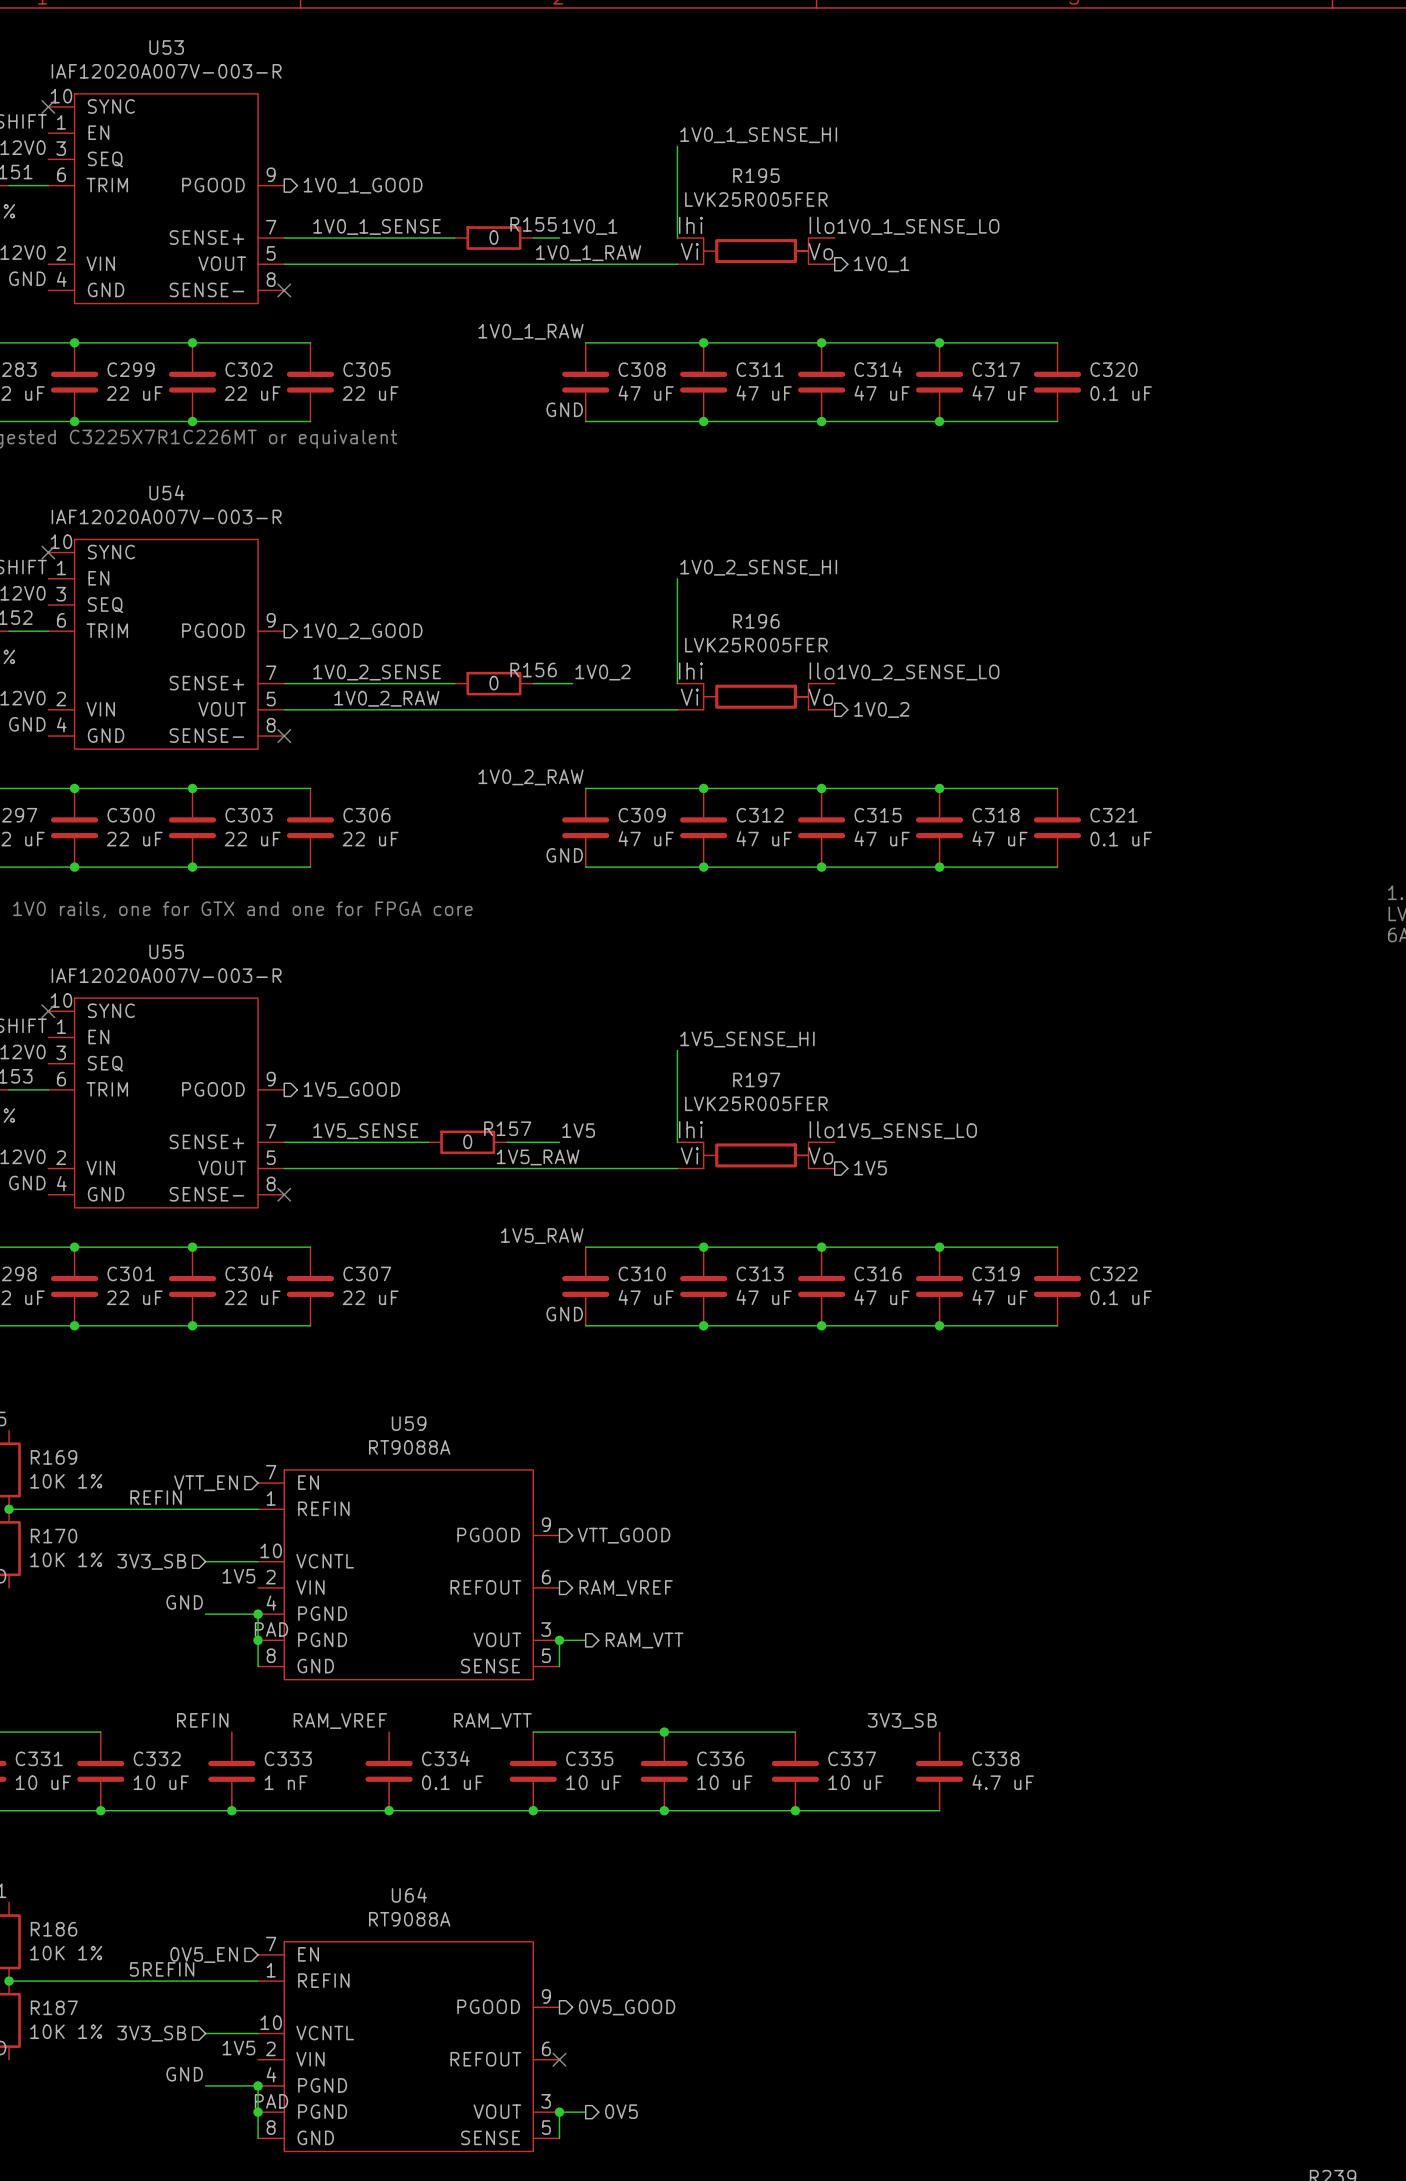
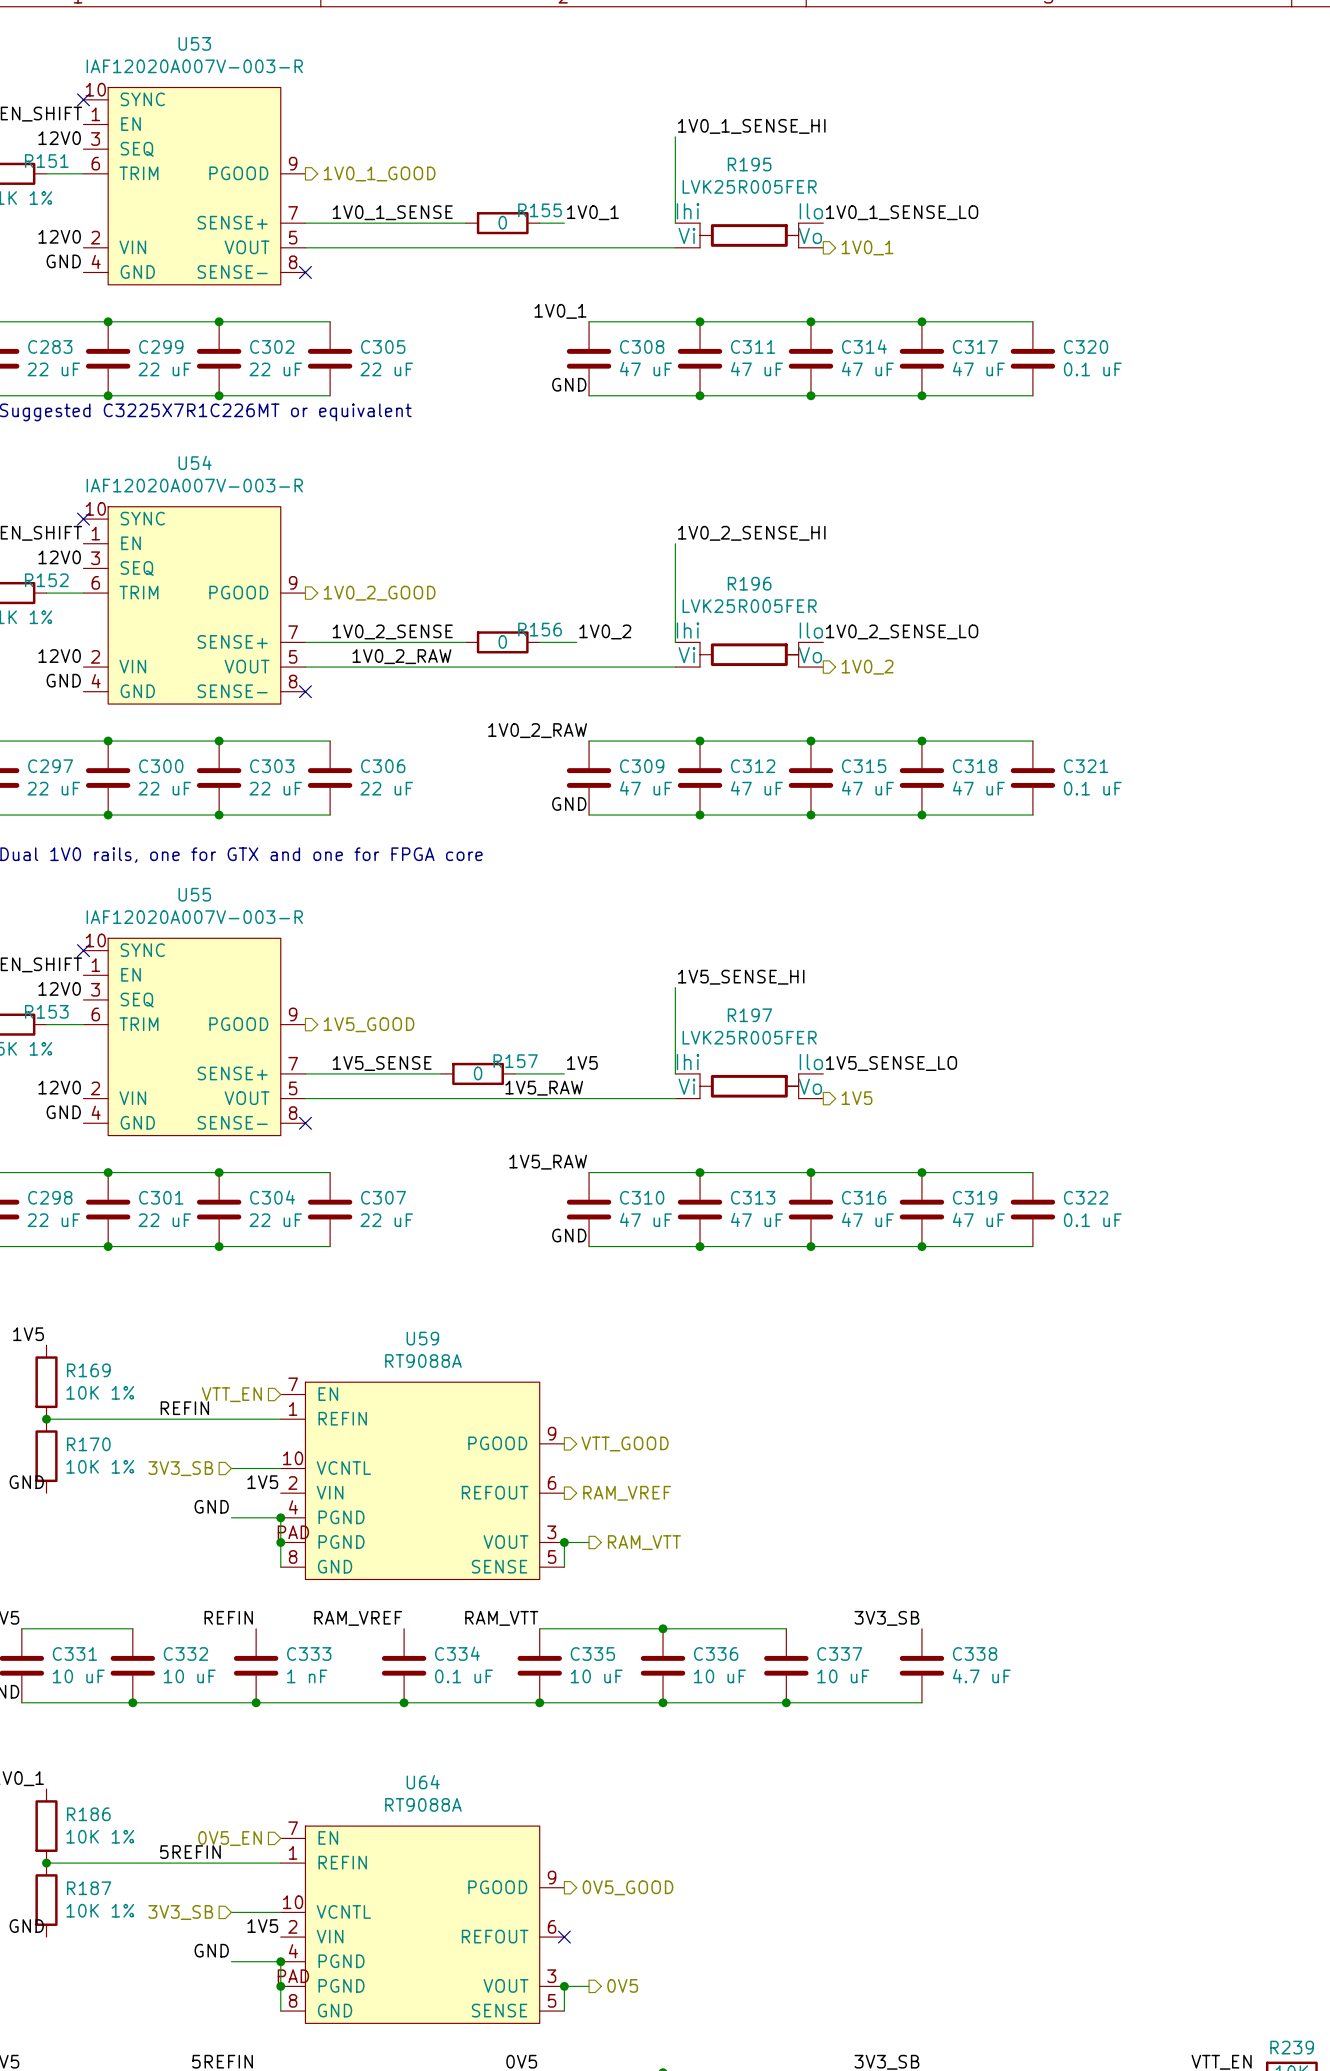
label: 1V0_1_RAW (588, 253) -> none
label: 1V0_1_RAW (530, 331) -> 1V0_1 (560, 311)

